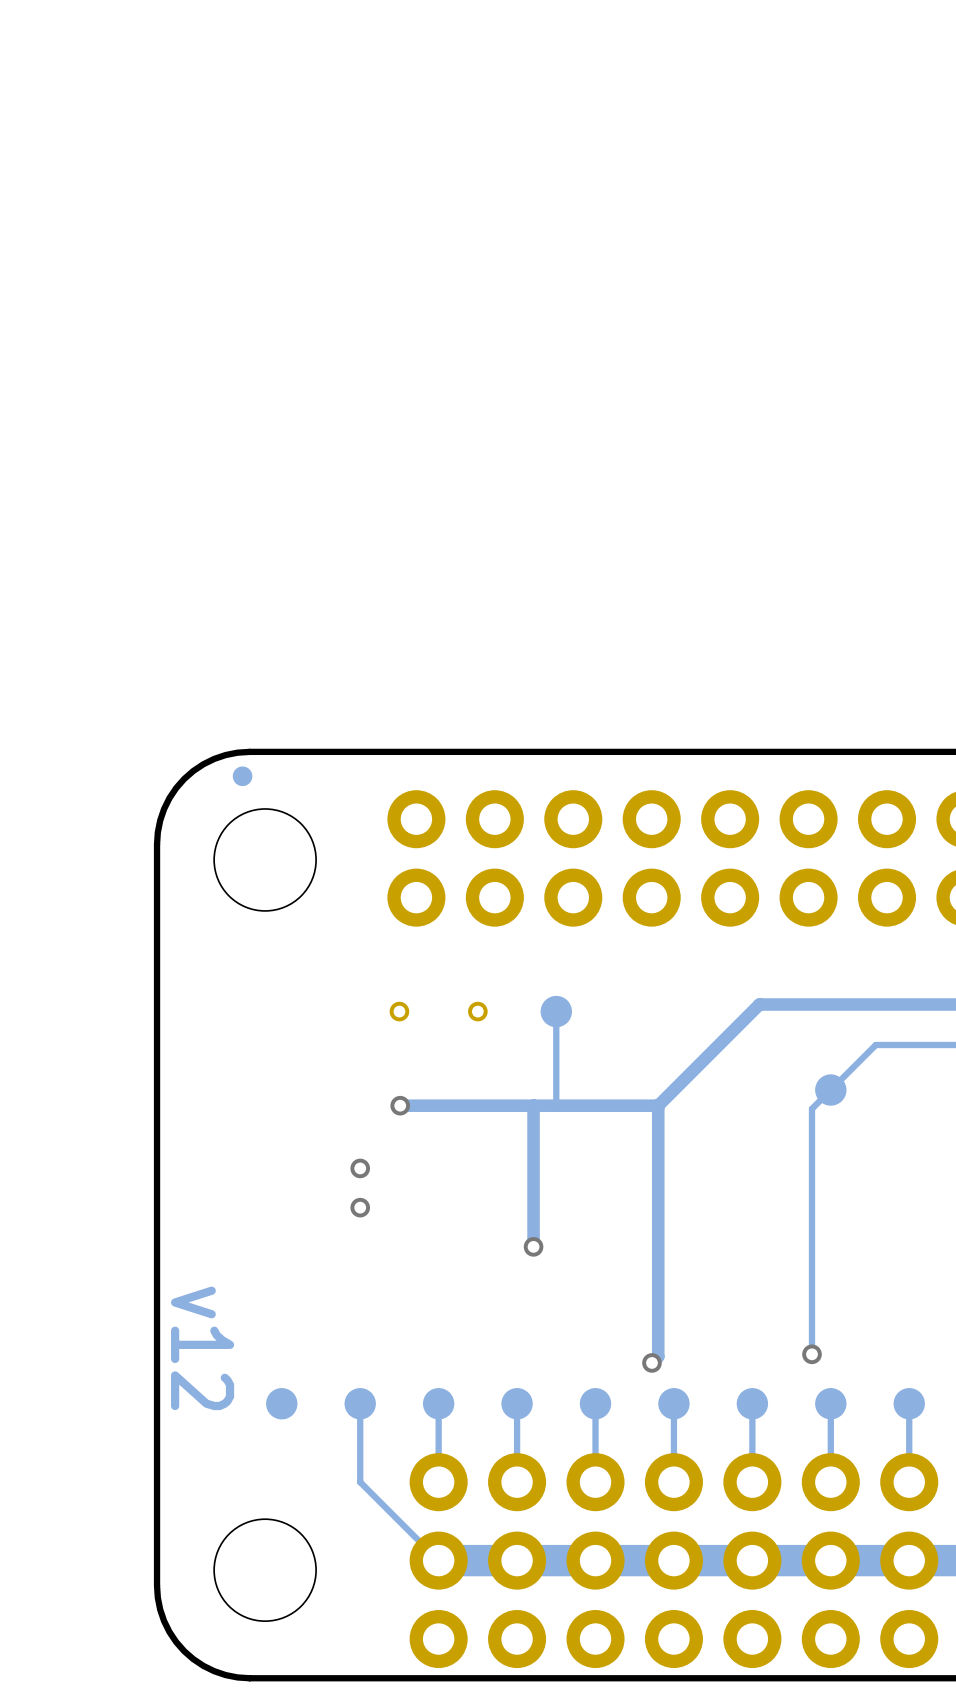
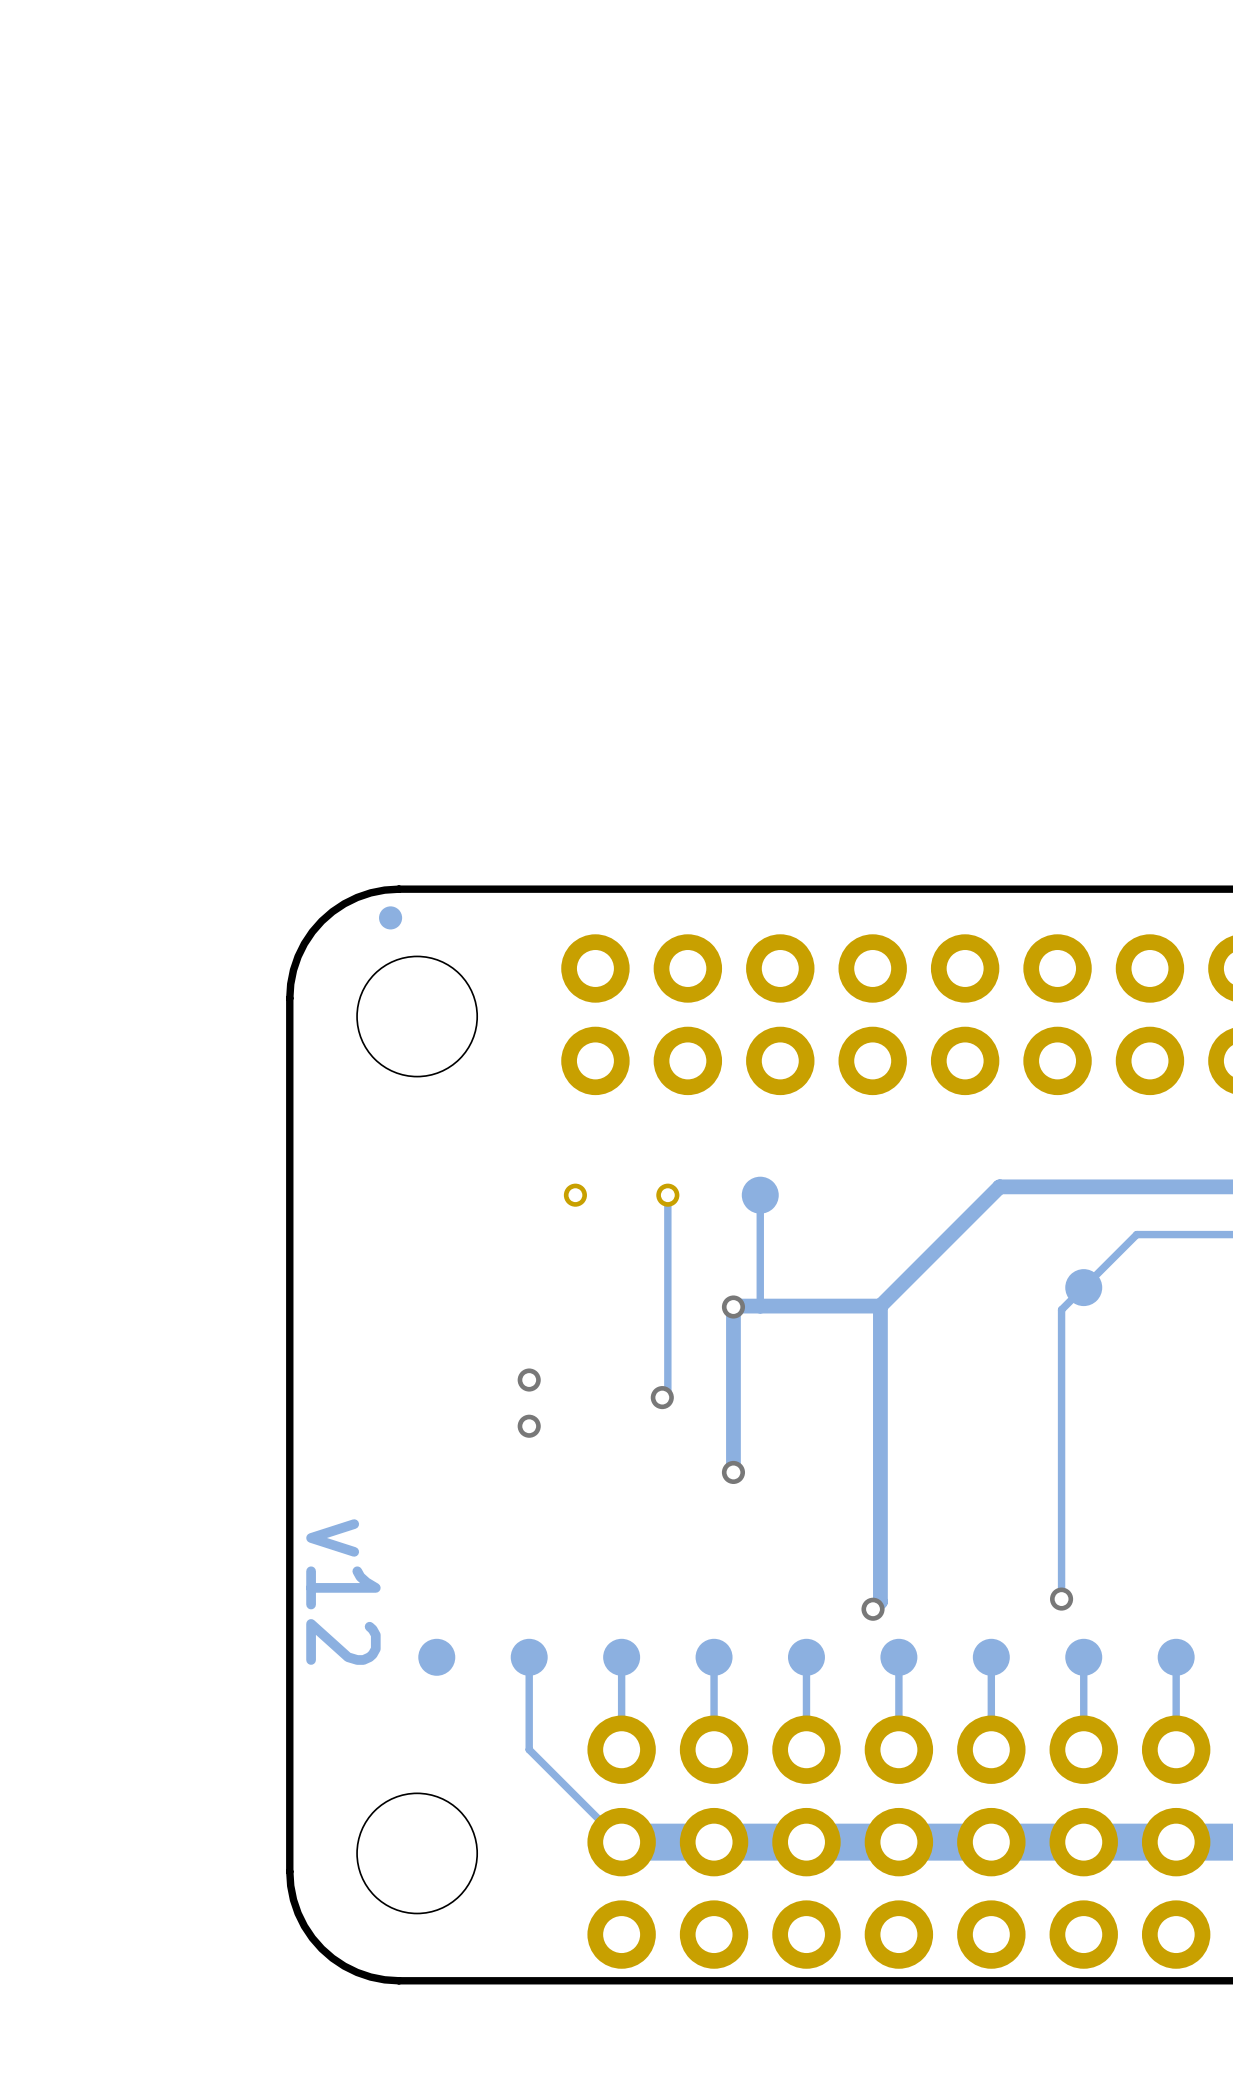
track: none -> (667, 1195) (667, 1392) (662, 1397)
via: (400, 1105) -> none
track: (533, 1105) (400, 1105) -> none
via: none -> (733, 1307)
via: none -> (662, 1397)

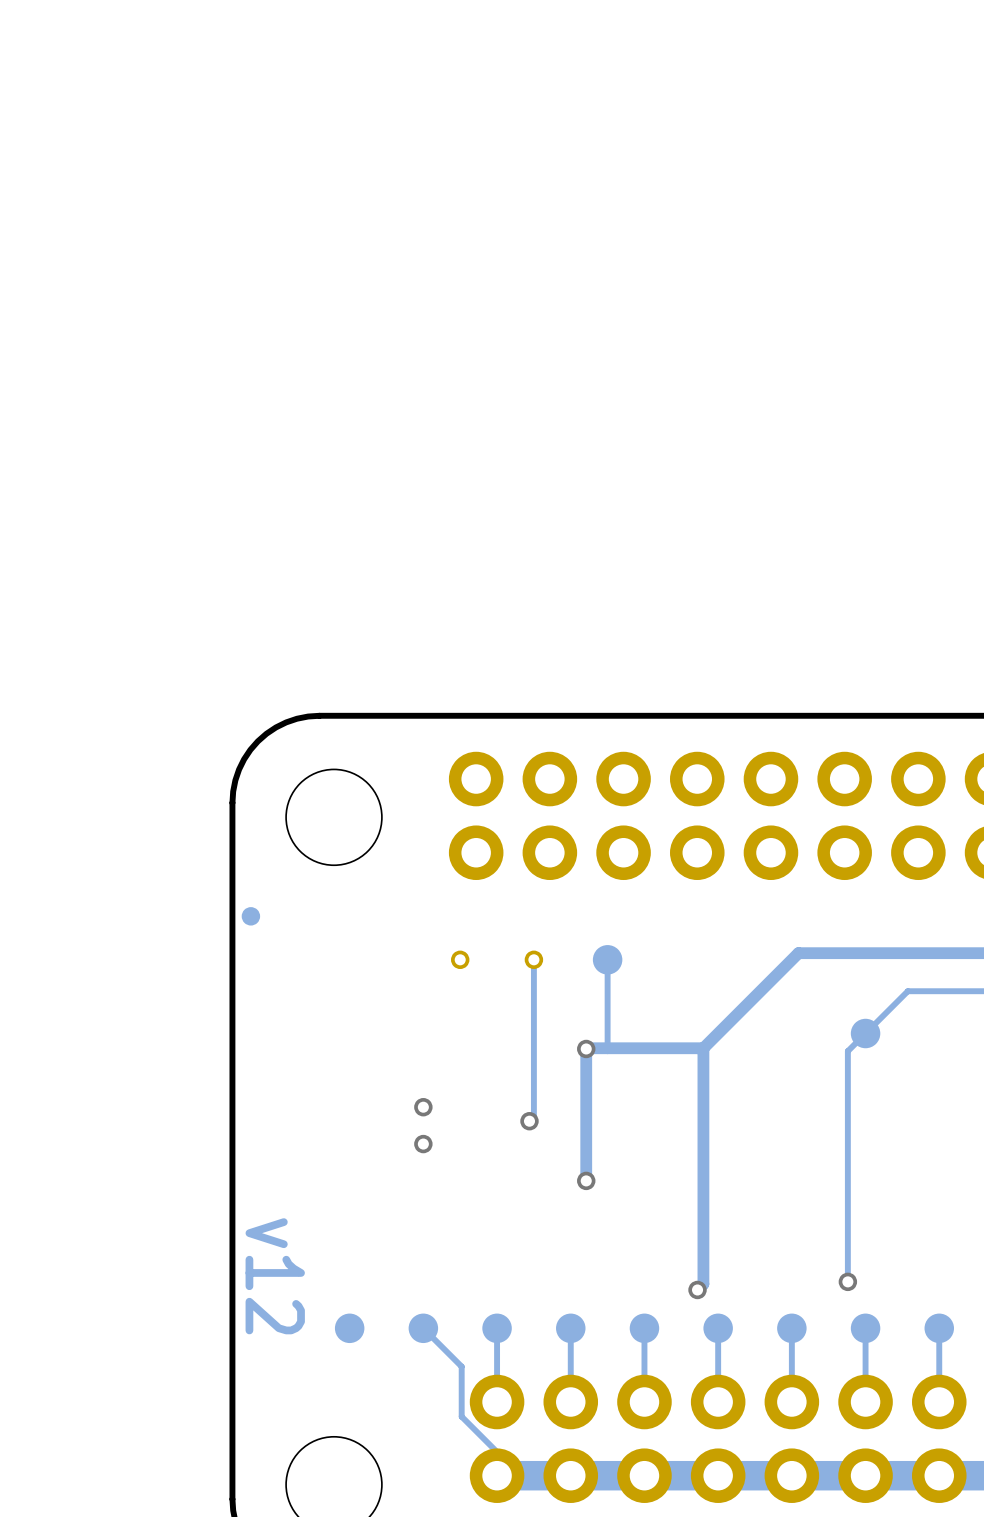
part position: (390, 917) -> (250, 916)
track: (529, 1657) (529, 1749) (621, 1842) -> (423, 1328) (461, 1366) (461, 1416) (497, 1452) (497, 1475)

